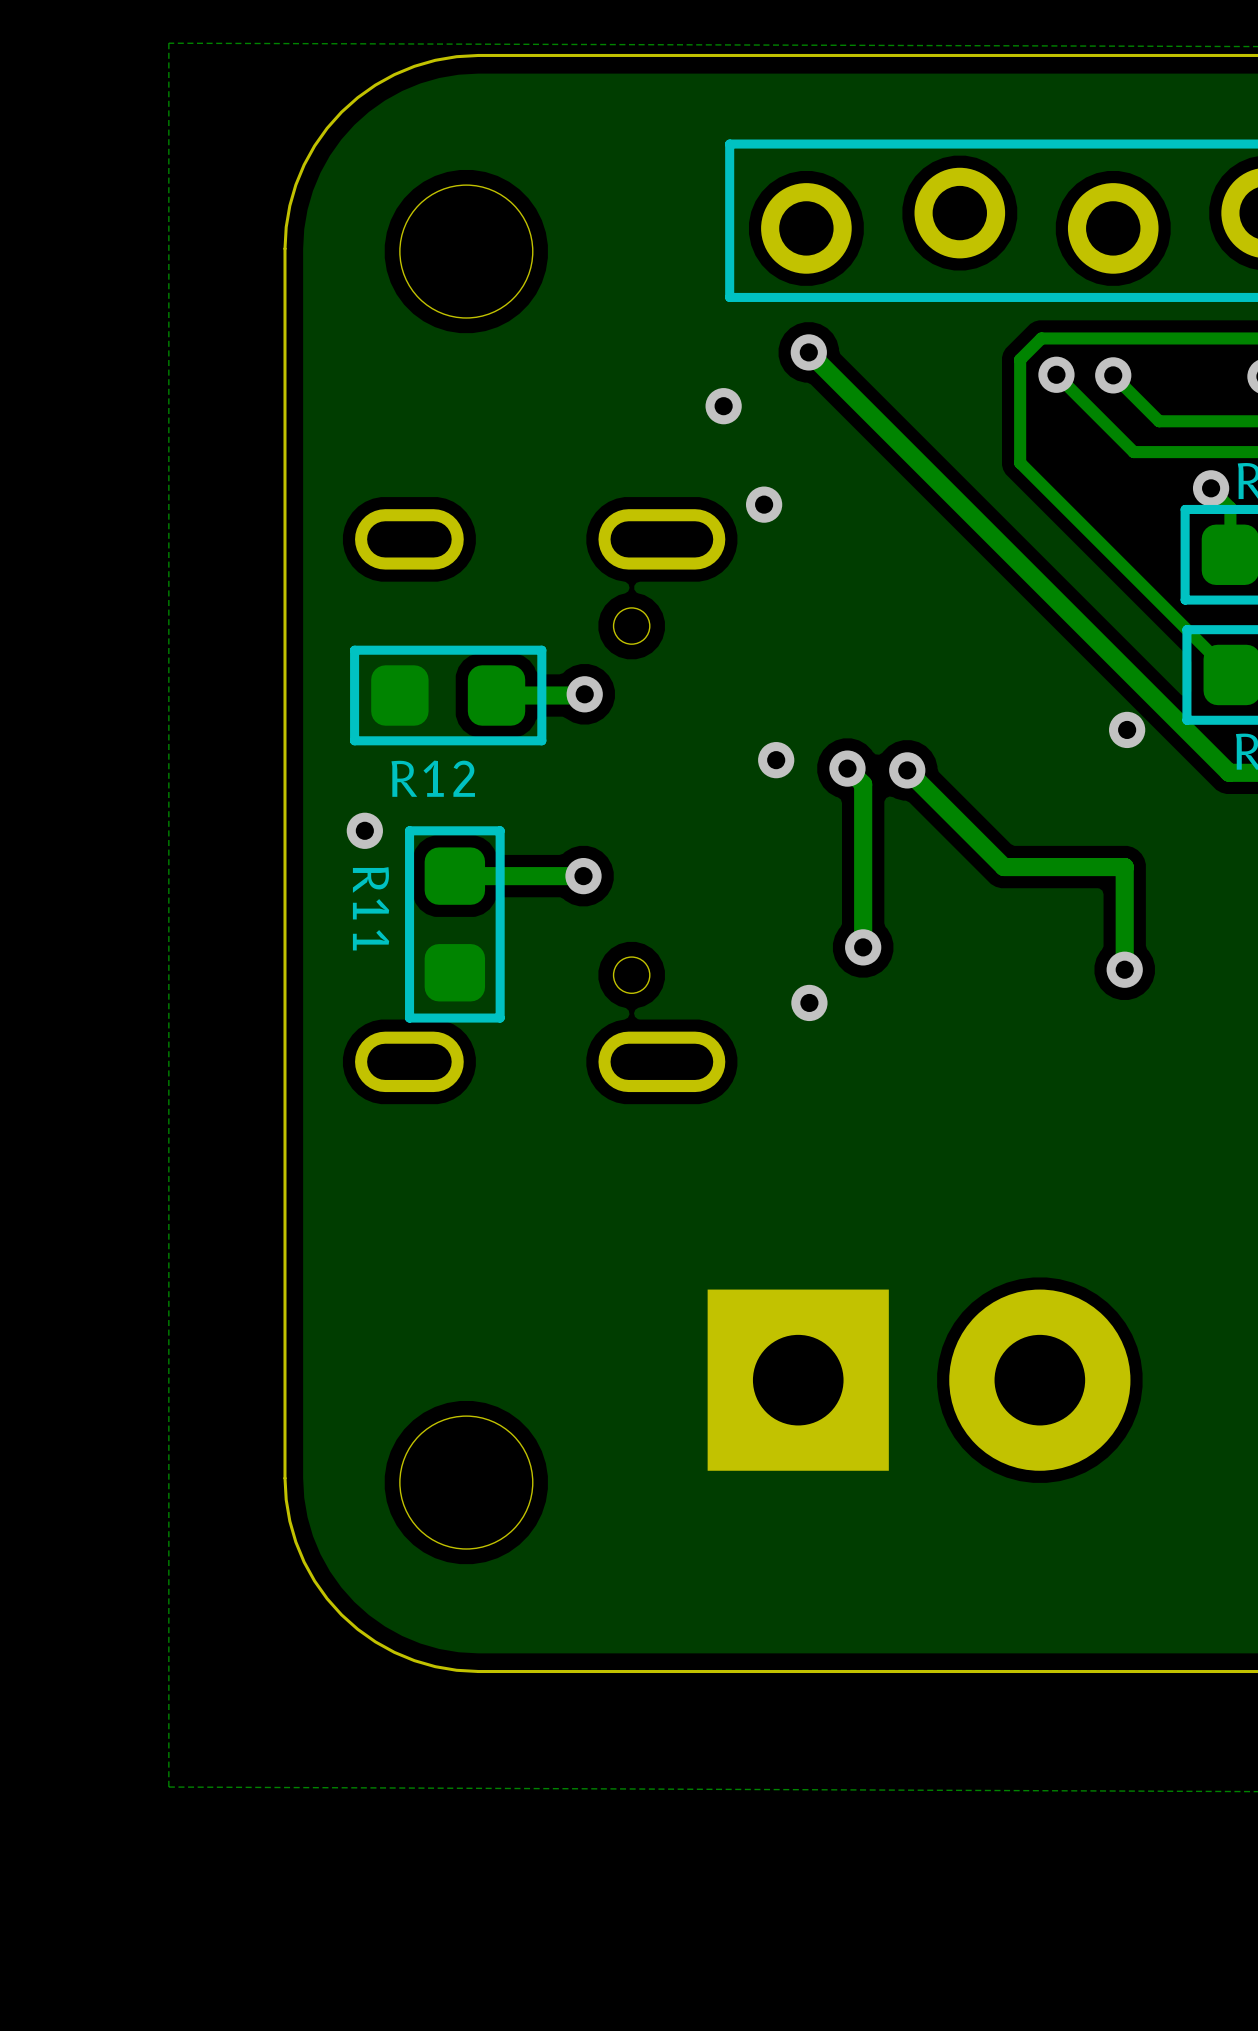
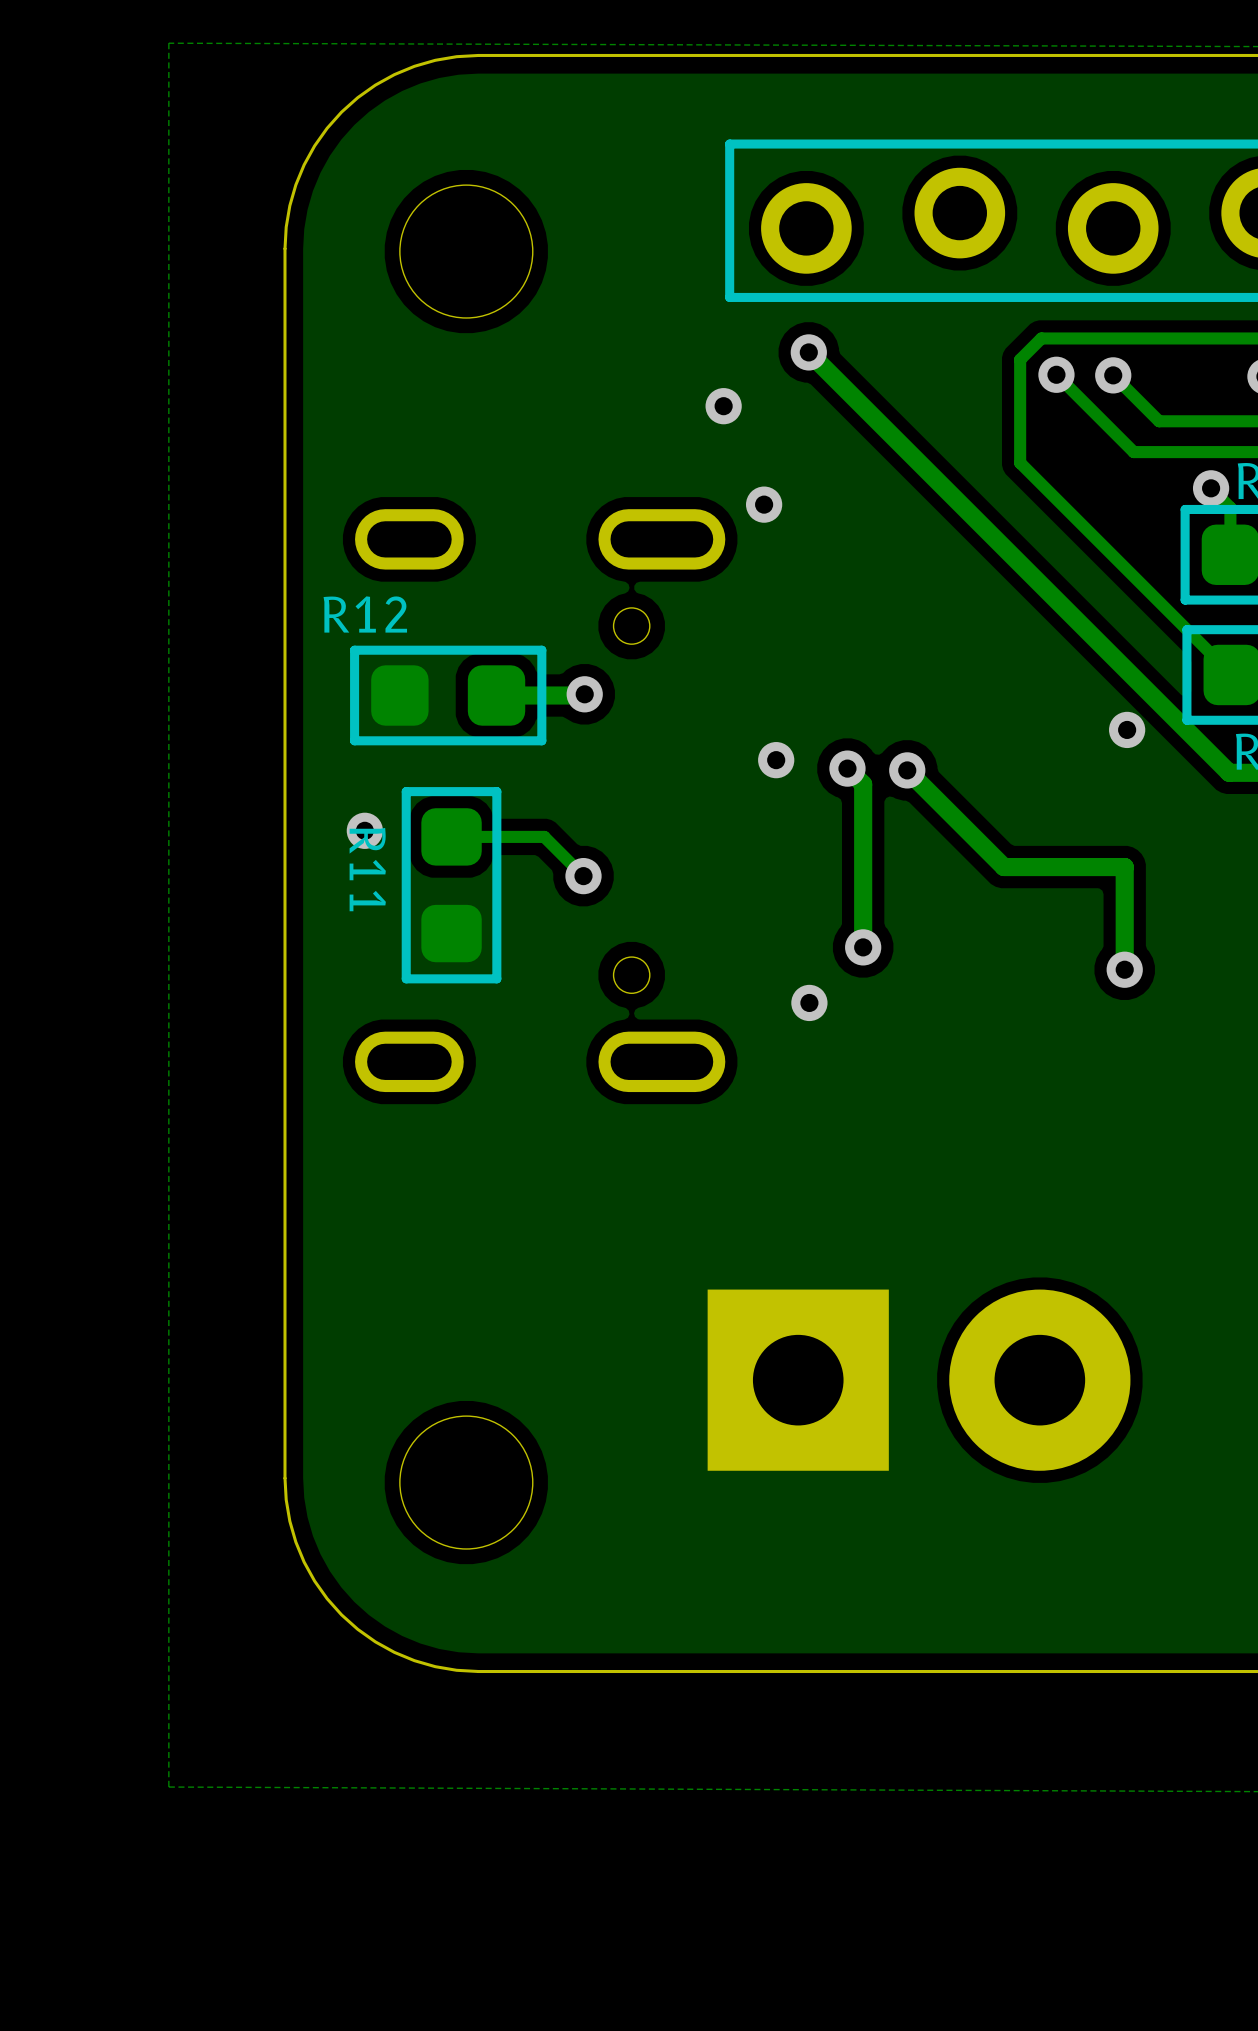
R12 name position: R12 (433, 778) -> R12 (365, 614)
track: (583, 876) (454, 876) -> (583, 876) (544, 836) (451, 836)
R11 position: (454, 924) -> (451, 885)

